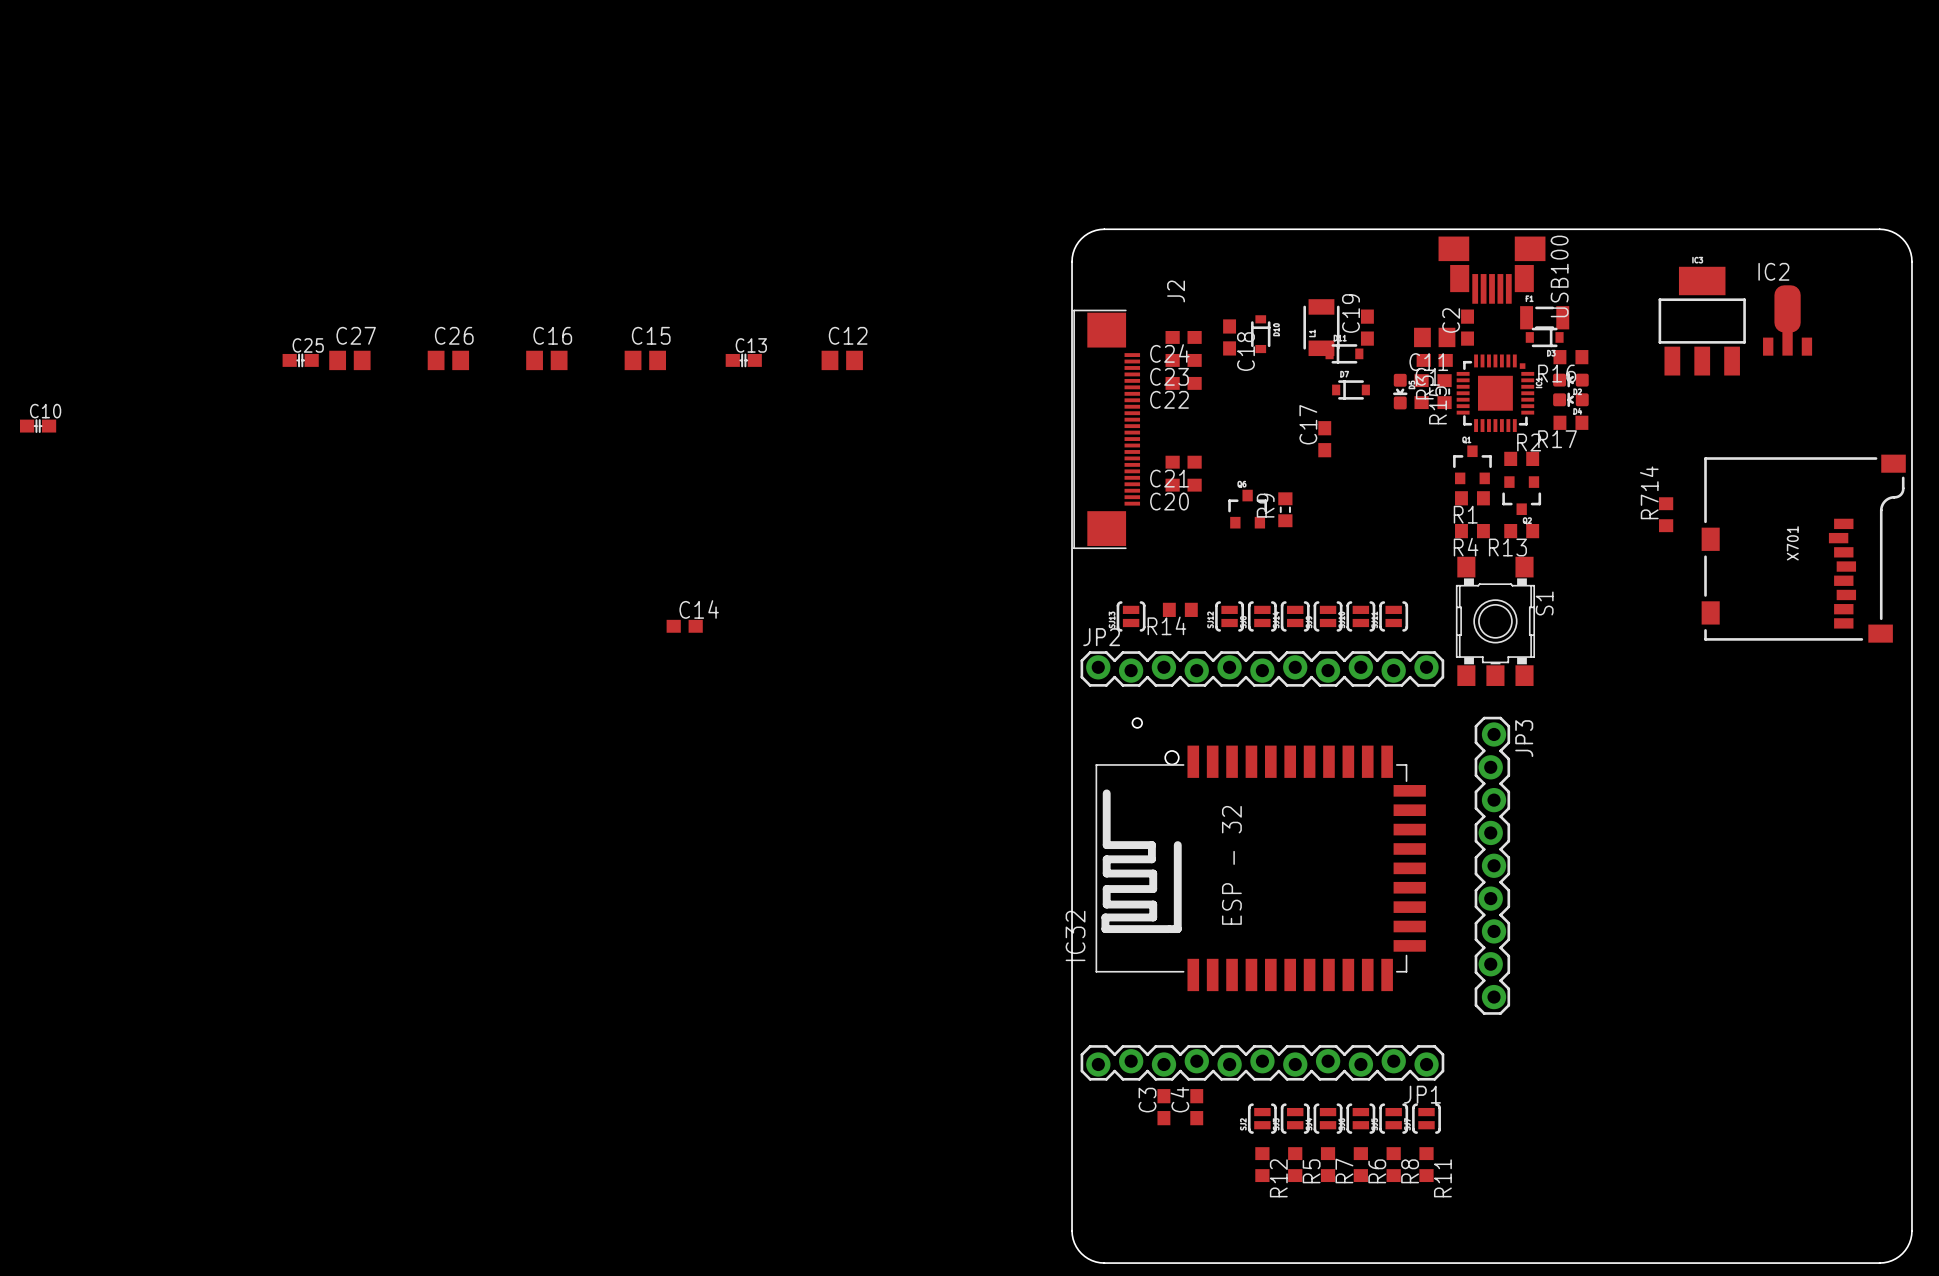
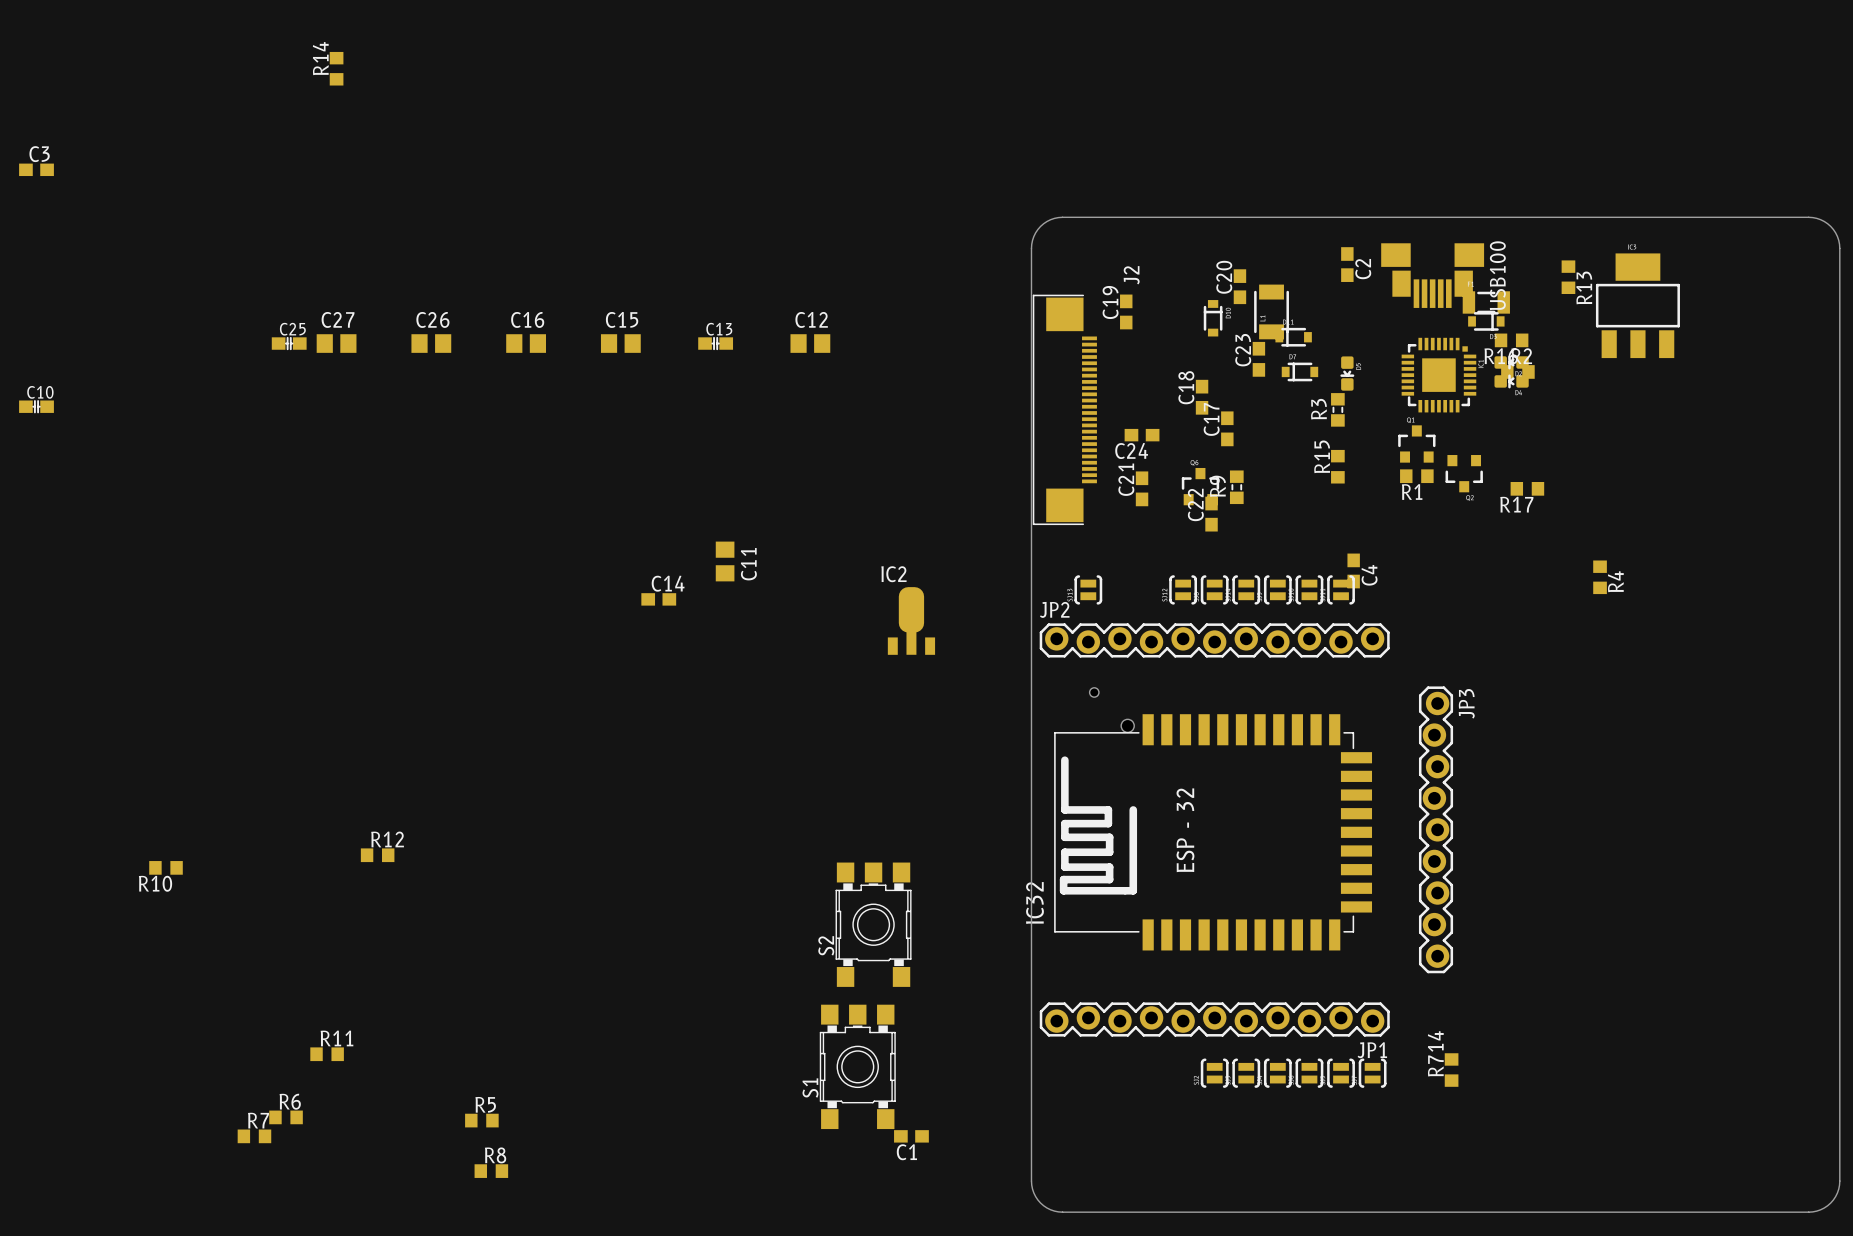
USB100 position: (1492, 270) -> (1432, 275)
C2 name position: C2 (1451, 320) -> C2 (1363, 269)
IC2 position: (1787, 320) -> (911, 620)
C19 position: (1367, 327) -> (1126, 311)
C2 position: (1467, 327) -> (1347, 264)
C24 position: (1183, 337) -> (1142, 435)
C18 position: (1229, 337) -> (1202, 397)
C11 rotation: 0° (1434, 337) -> 90° clockwise (725, 561)
C11 position: (1434, 337) -> (725, 561)
C18 name position: C18 (1245, 351) -> C18 (1186, 387)
C23 rotation: 0° (1183, 360) -> 90° clockwise (1258, 359)
C23 position: (1183, 360) -> (1258, 359)
C1 position: (1434, 360) -> (911, 1136)
C11 name position: C11 (1428, 362) -> C11 (748, 564)
C22 rotation: 0° (1183, 383) -> 90° clockwise (1211, 514)
C22 position: (1183, 383) -> (1211, 514)
R15 position: (1421, 391) -> (1337, 466)
R3 position: (1444, 391) -> (1337, 409)
R15 name position: R15 (1437, 405) -> R15 (1322, 456)
R17 position: (1570, 422) -> (1527, 488)
C17 position: (1324, 439) -> (1227, 428)
R2 position: (1521, 458) -> (1517, 371)
C21 rotation: 0° (1183, 462) -> 90° clockwise (1142, 488)
C21 position: (1183, 462) -> (1142, 488)
C20 rotation: 0° (1183, 485) -> 90° clockwise (1239, 286)
C20 position: (1183, 485) -> (1239, 286)
R714 position: (1666, 514) -> (1451, 1070)
R4 rotation: 0° (1472, 531) -> 90° clockwise (1600, 577)
R4 position: (1472, 531) -> (1600, 577)
R13 rotation: 0° (1521, 531) -> 90° clockwise (1568, 277)
R13 position: (1521, 531) -> (1568, 277)
R4 name position: R4 (1466, 547) -> R4 (1615, 581)
R13 name position: R13 (1507, 547) -> R13 (1584, 287)
X701: (1803, 548) -> none
R14 rotation: 0° (1180, 609) -> 90° clockwise (336, 68)
R14 position: (1180, 609) -> (336, 68)
S1 rotation: 0° (1495, 621) -> 180° (857, 1066)
S1 position: (1495, 621) -> (857, 1066)
R10: none -> (166, 867)
S2: none -> (873, 924)
C4 name position: C4 (1179, 1099) -> C4 (1369, 575)
C3 rotation: 0° (1163, 1107) -> 90° clockwise (36, 169)
C3 position: (1163, 1107) -> (36, 169)
C4 position: (1196, 1107) -> (1353, 570)
R12 rotation: 0° (1262, 1164) -> 90° clockwise (377, 855)
R12 position: (1262, 1164) -> (377, 855)
R5 rotation: 0° (1295, 1164) -> 90° clockwise (481, 1120)
R5 position: (1295, 1164) -> (481, 1120)
R7 rotation: 0° (1328, 1164) -> 90° clockwise (254, 1136)
R7 position: (1328, 1164) -> (254, 1136)
R6 rotation: 0° (1360, 1164) -> 90° clockwise (286, 1117)
R6 position: (1360, 1164) -> (286, 1117)
R8 rotation: 0° (1393, 1164) -> 90° clockwise (491, 1171)
R8 position: (1393, 1164) -> (491, 1171)
R11 rotation: 0° (1426, 1164) -> 90° clockwise (327, 1054)
R11 position: (1426, 1164) -> (327, 1054)
R7 name position: R7 (1344, 1170) -> R7 (258, 1120)
R5 name position: R5 (1311, 1171) -> R5 (485, 1104)
R6 name position: R6 (1377, 1171) -> R6 (290, 1101)
R8 name position: R8 (1410, 1171) -> R8 (495, 1155)
R12 name position: R12 (1278, 1178) -> R12 (387, 839)
R11 name position: R11 (1442, 1178) -> R11 (336, 1038)

